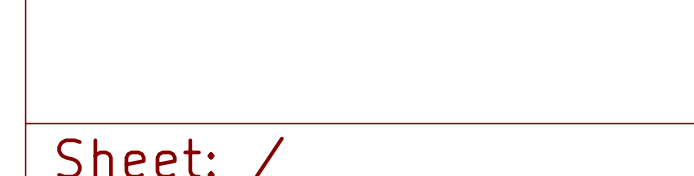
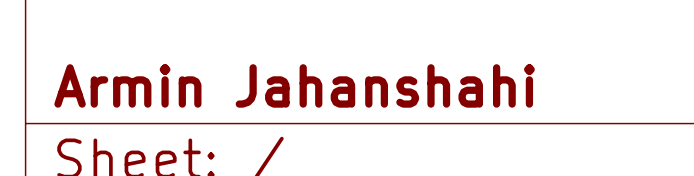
title block: none -> Armin Jahanshahi (294, 85)

